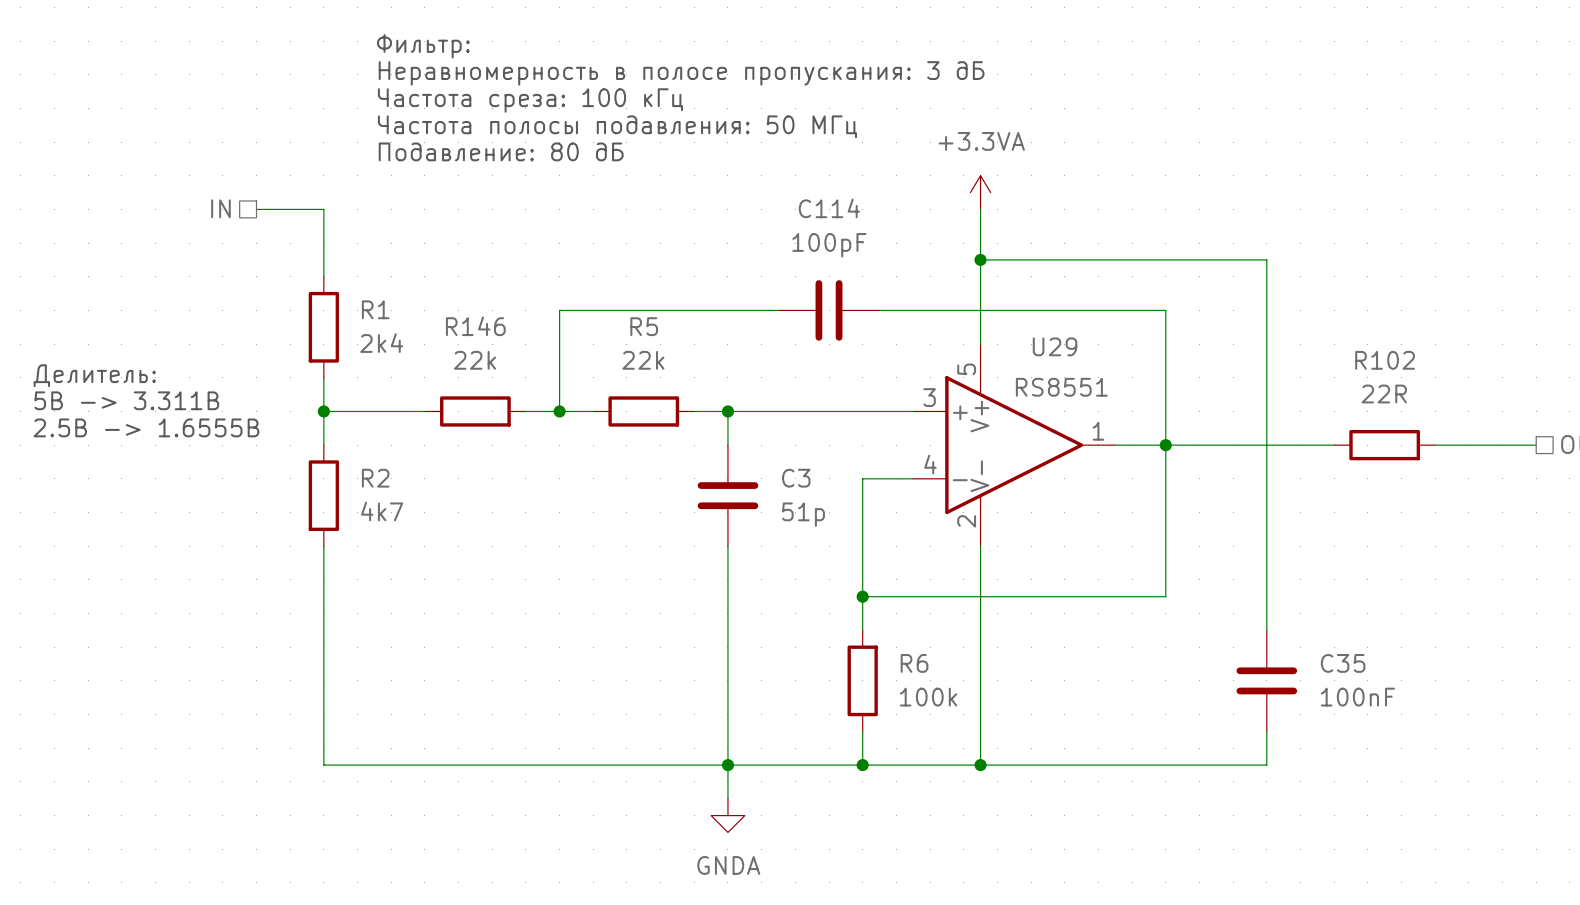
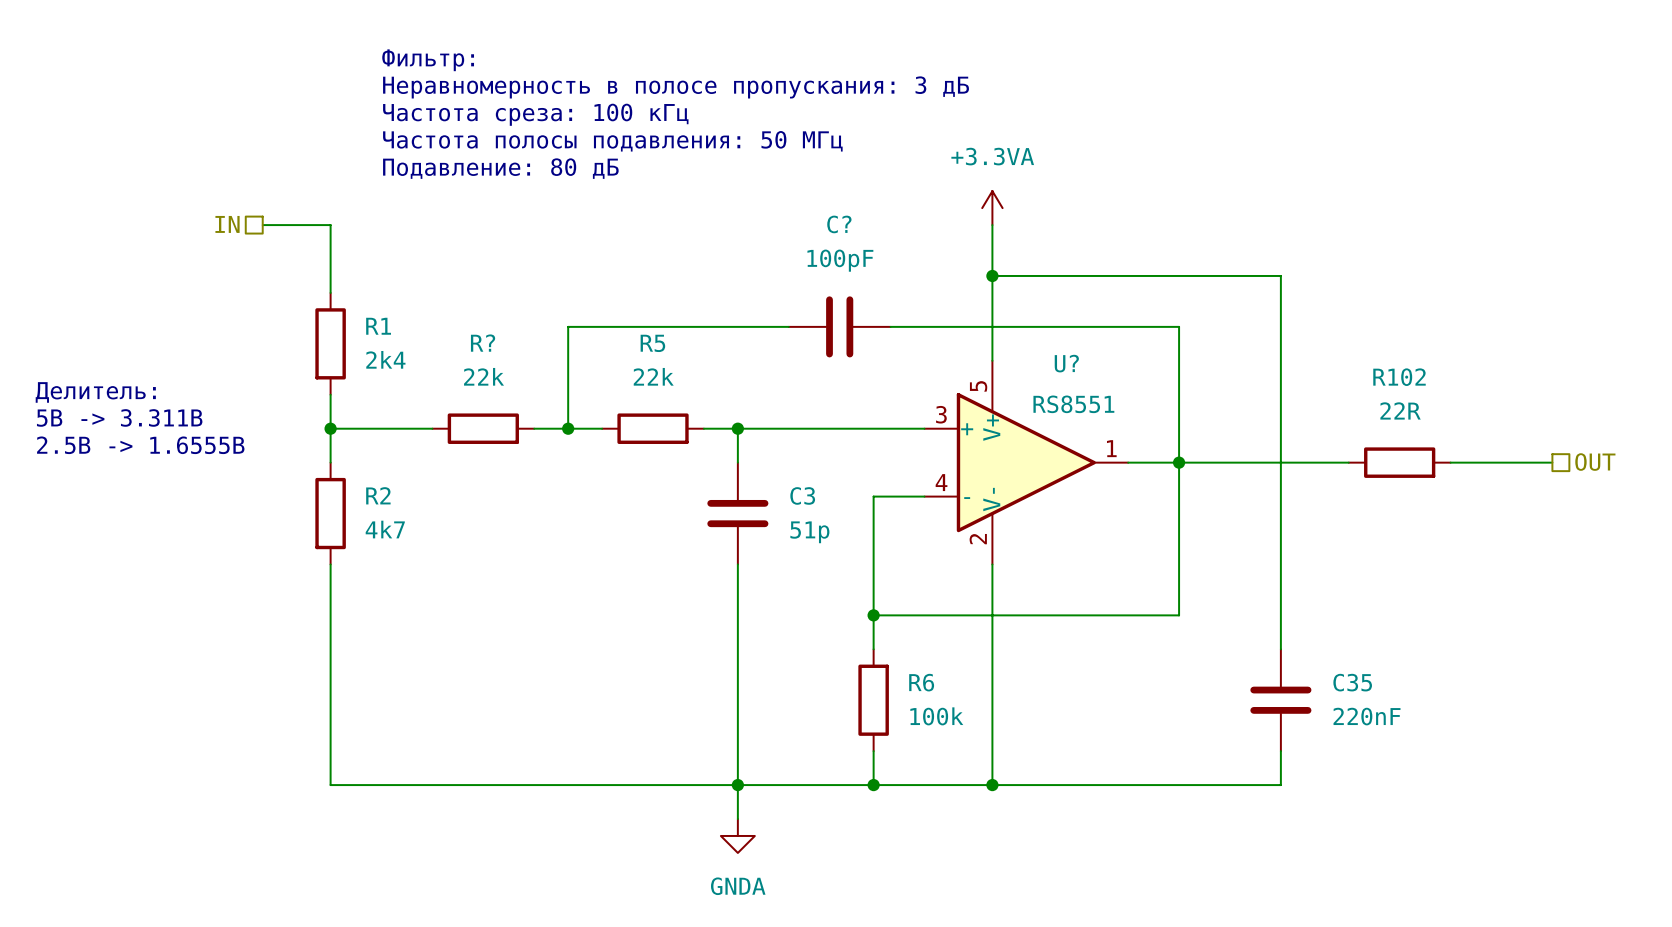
C114 name: C114 (829, 208) -> C? (839, 224)
R146 name: R146 (475, 326) -> R? (483, 343)
U29 name: U29 (1055, 346) -> U? (1066, 363)
C35 value: 100nF (1357, 697) -> 220nF (1367, 716)

